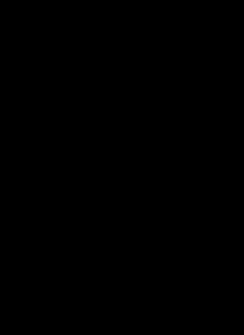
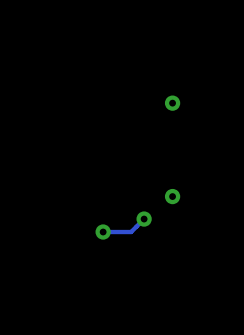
via: none -> (172, 103)
via: none -> (172, 196)
track: none -> (144, 219) (131, 232) (103, 232)
via: none -> (144, 219)
via: none -> (103, 232)

